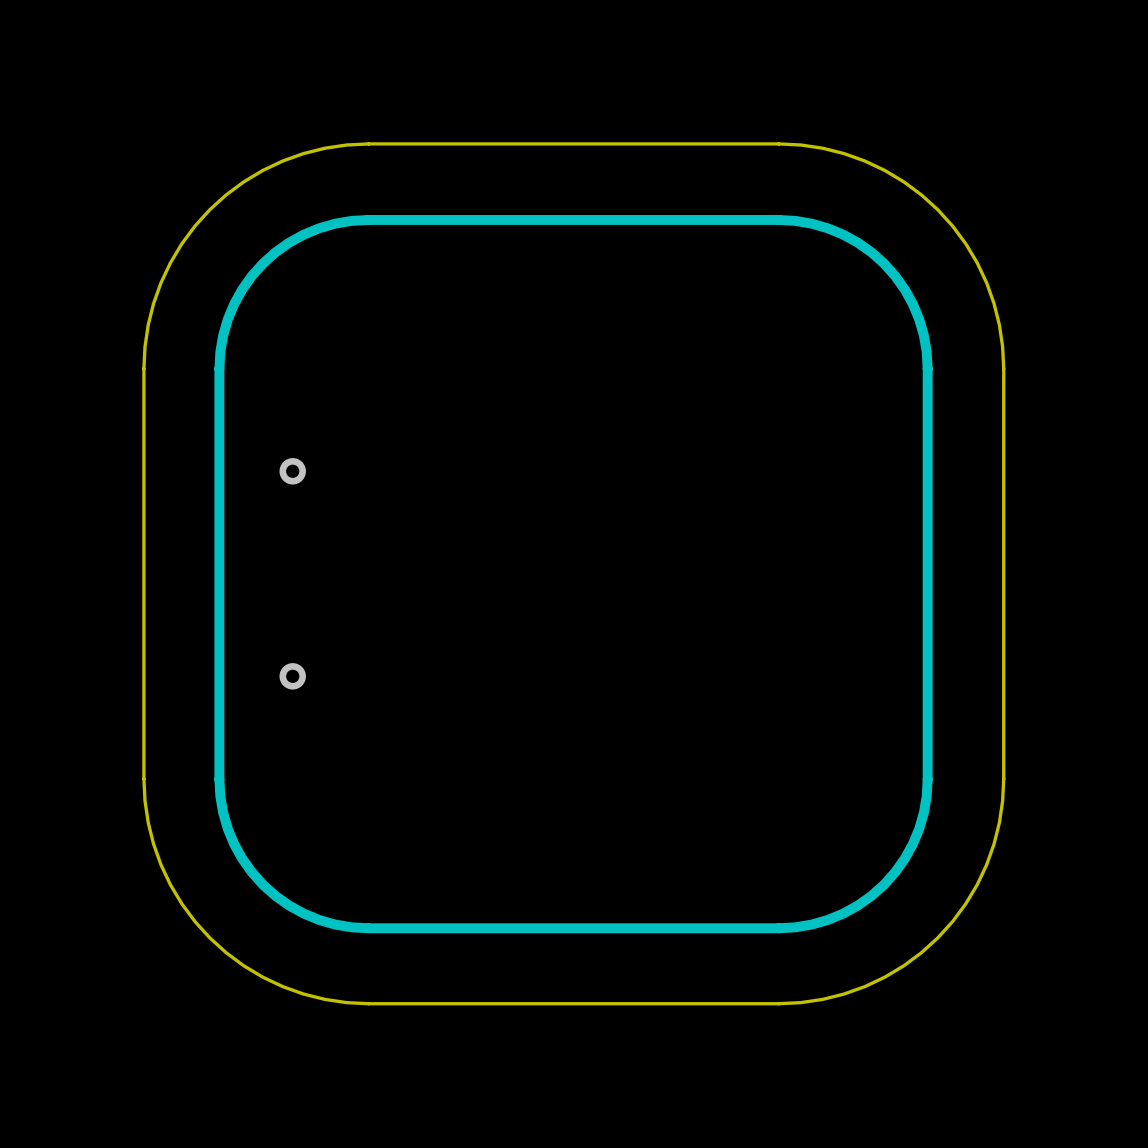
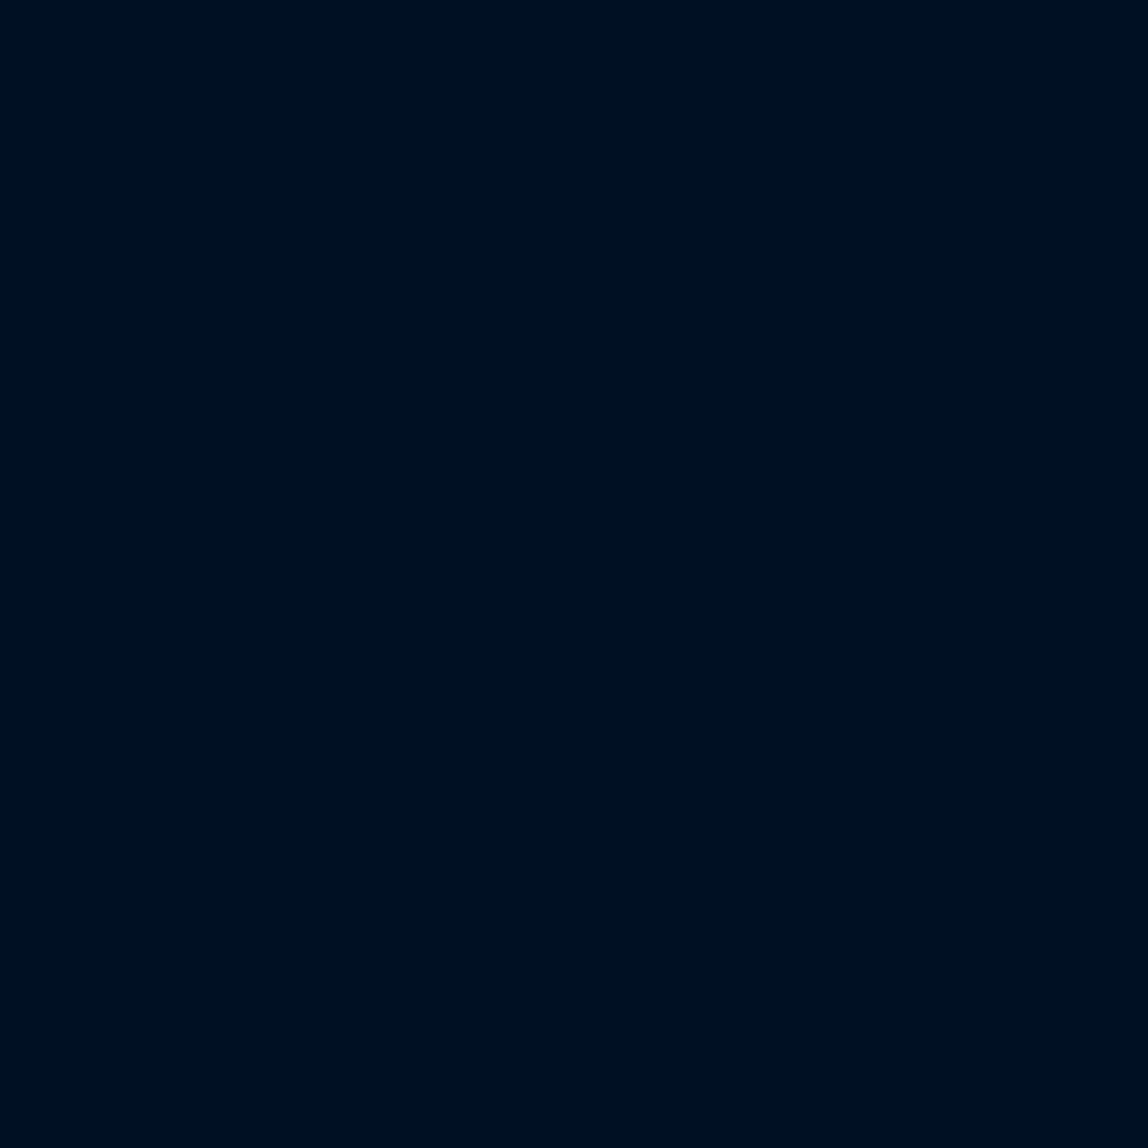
board edge: (368, 143) (778, 143) (822, 148) (864, 161) (903, 181) (937, 209) (965, 243) (986, 282) (999, 324) (1002, 346) (1002, 800) (994, 844) (986, 864) (965, 903) (937, 937) (903, 965) (864, 986) (844, 994) (800, 1002) (346, 1002) (303, 994) (262, 977) (226, 952) (209, 937) (181, 903) (161, 864) (148, 822) (145, 800) (143, 368) (148, 324) (153, 303) (170, 262) (194, 226) (226, 194) (262, 170) (303, 153) (346, 145) (368, 143) -> none
line: (368, 219) (795, 220) (811, 223) (843, 234) (871, 252) (895, 276) (904, 289) (919, 319) (926, 352) (927, 779) (923, 812) (912, 844) (895, 872) (871, 895) (843, 913) (827, 919) (795, 927) (368, 928) (335, 924) (303, 913) (275, 895) (251, 872) (242, 858) (227, 828) (223, 812) (219, 779) (219, 368) (223, 335) (227, 319) (242, 289) (251, 276) (275, 252) (289, 242) (319, 228) (335, 223) (368, 219) -> none
via: (292, 471) -> none
via: (292, 676) -> none

